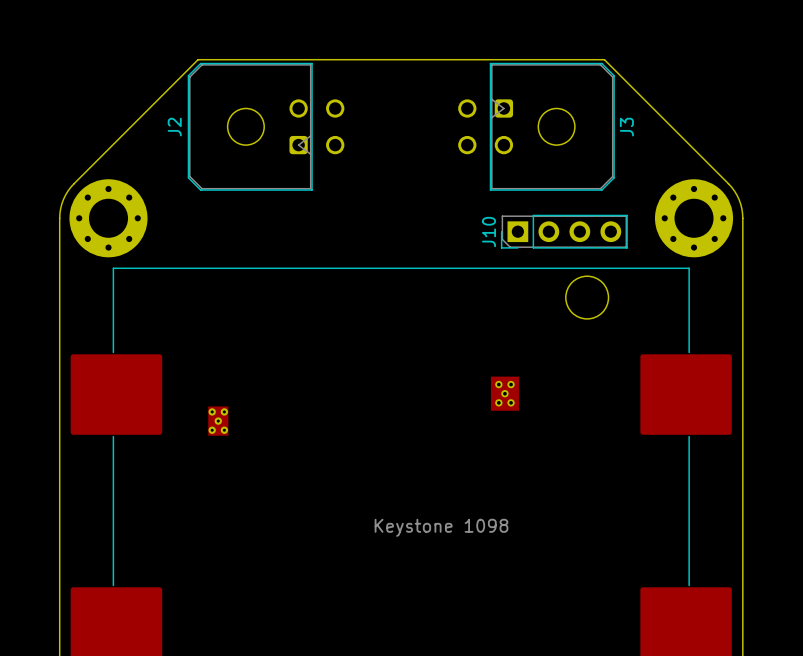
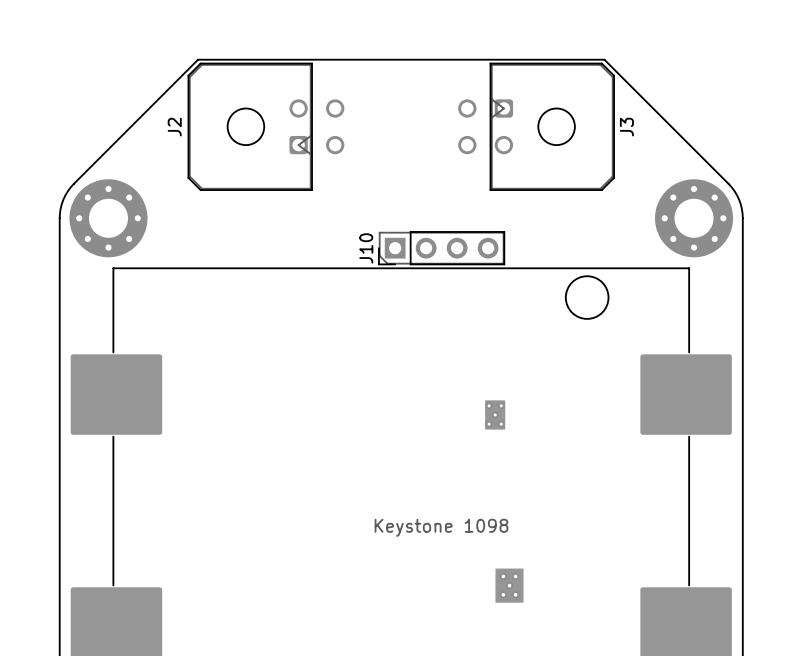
J10 position: (564, 231) -> (441, 248)
part position: (504, 393) -> (509, 585)
part position: (218, 421) -> (495, 414)

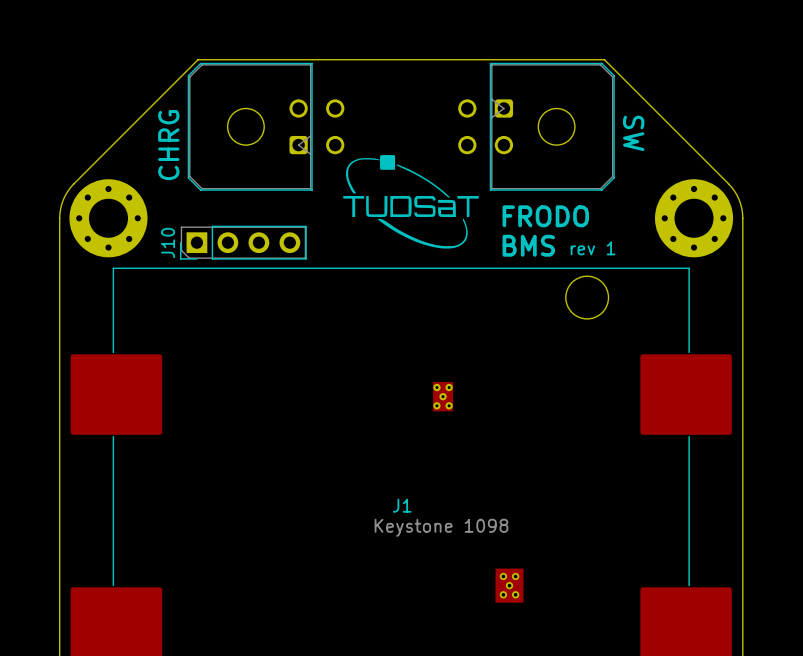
J2 name: J2 (174, 127) -> none
J3 name: J3 (626, 127) -> none
J3 text: none -> SW (633, 133)
J2 text: none -> CHRG (168, 145)
drawing: none -> [343, 155, 479, 249]
text: none -> FRODO (545, 216)
text: none -> BMS (528, 245)
J10 position: (441, 248) -> (243, 242)
text: none -> rev 1 (593, 248)
part position: (495, 414) -> (443, 396)
J1 name: none -> J1 (402, 505)

